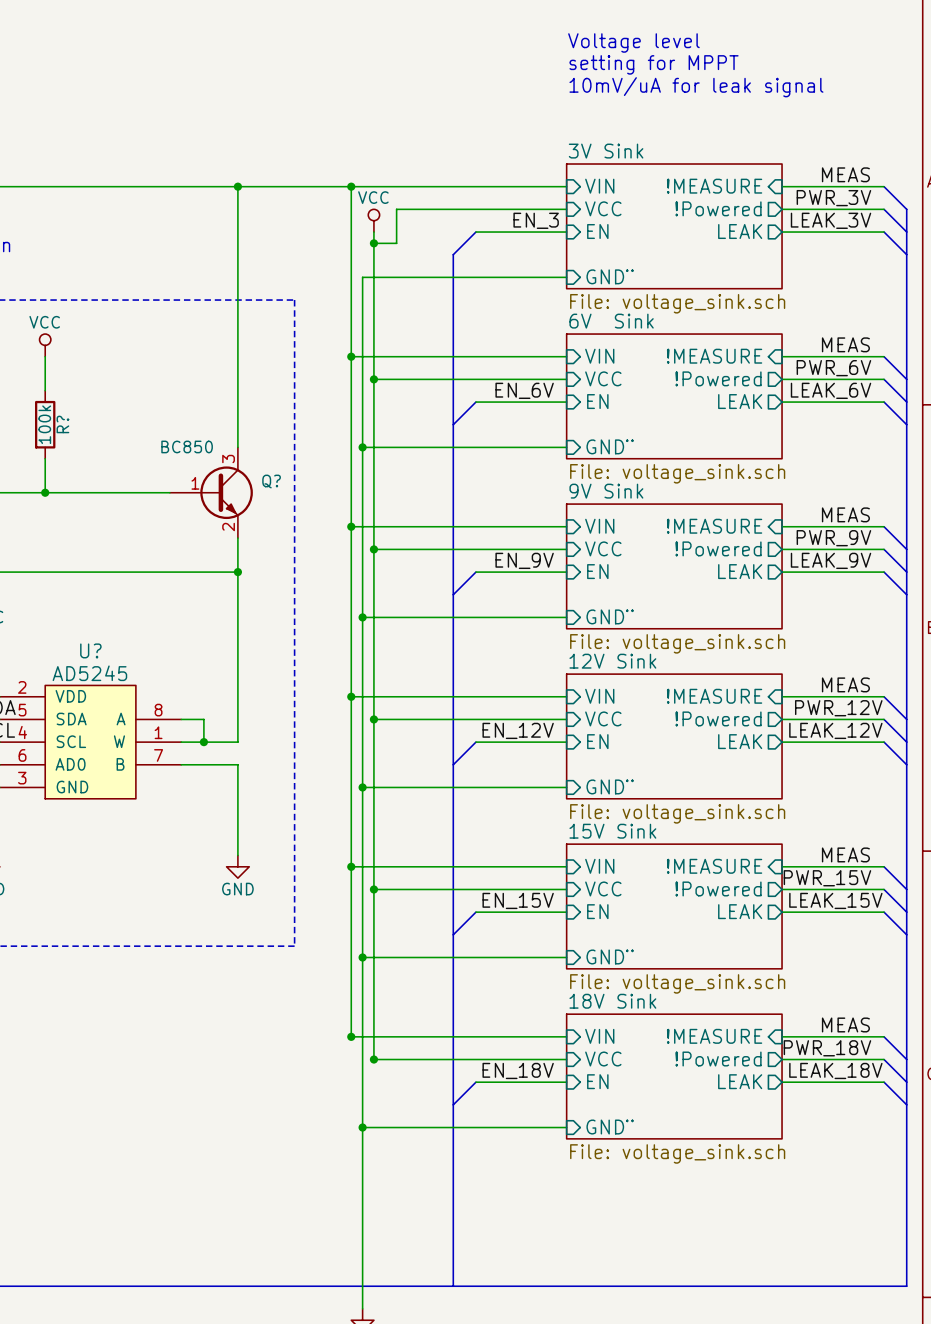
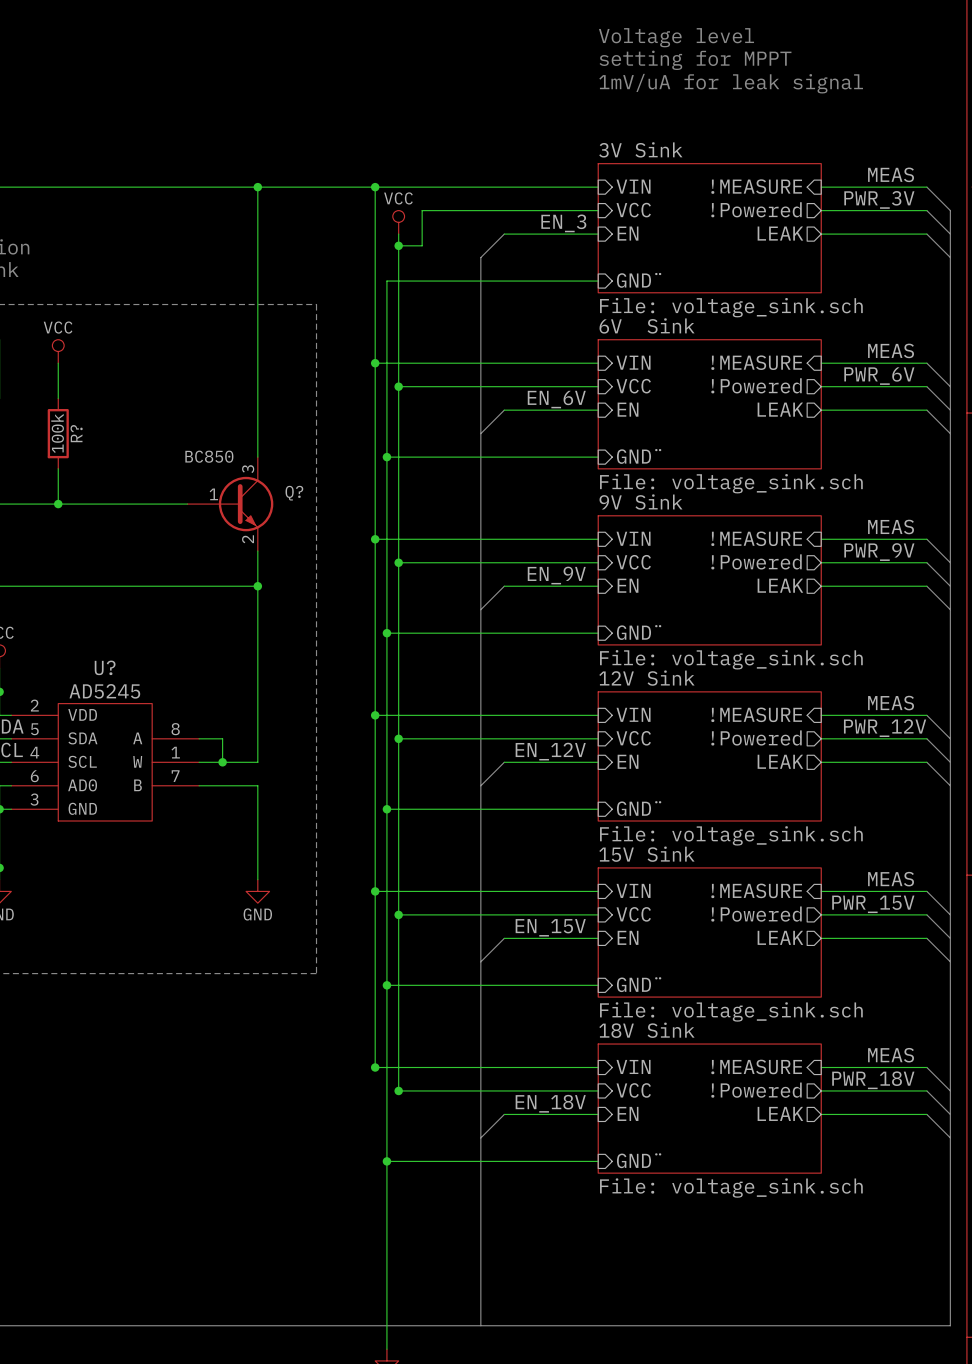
text: 10mV/uA for leak signal (696, 87) -> 1mV/uA for leak signal (731, 83)
label: LEAK_3V (831, 220) -> none
label: LEAK_6V (831, 390) -> none
label: LEAK_9V (831, 560) -> none
label: LEAK_12V (835, 730) -> none
label: LEAK_15V (835, 900) -> none
label: LEAK_18V (835, 1070) -> none

